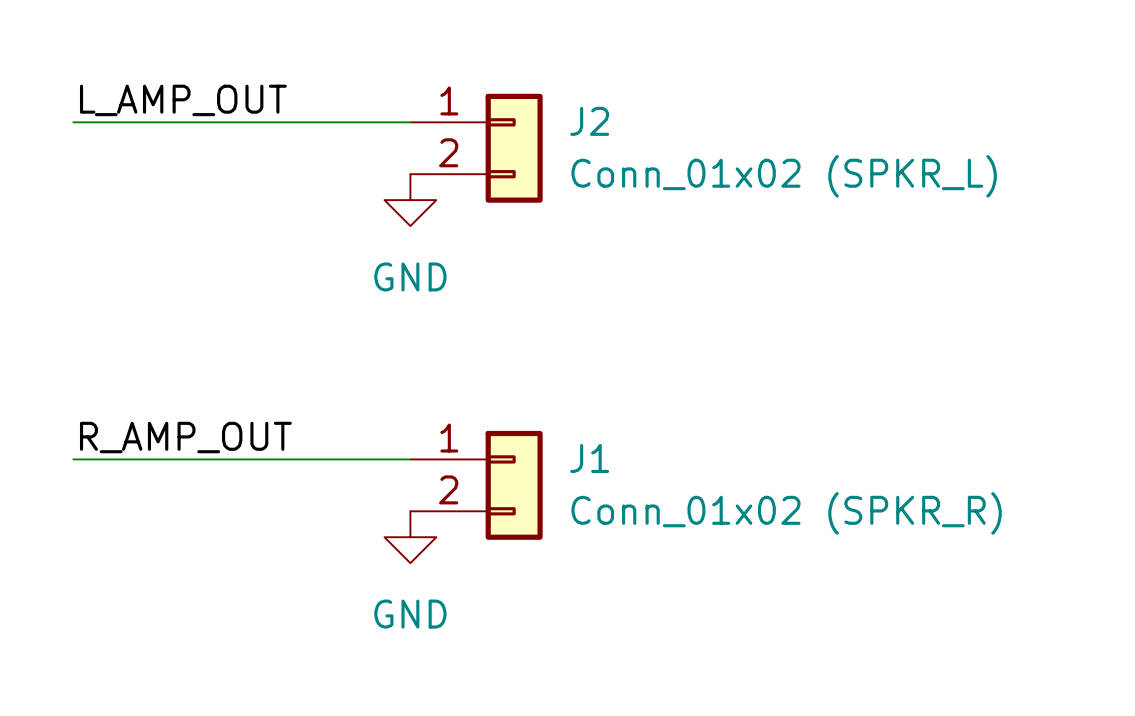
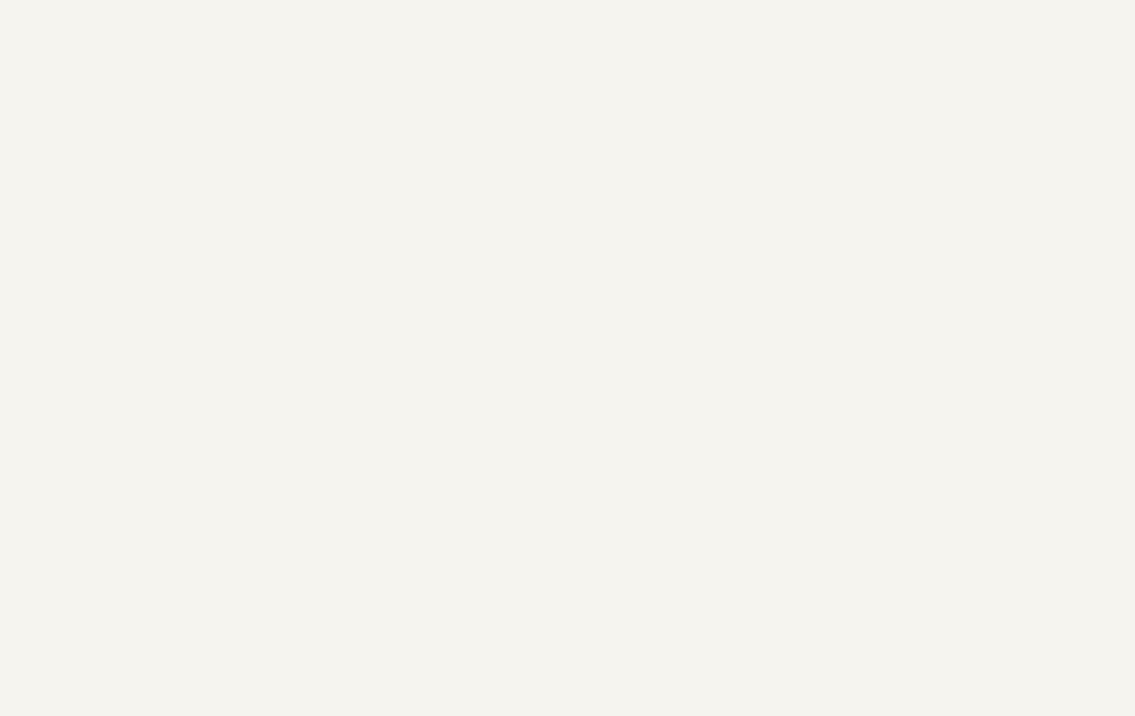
label: L_AMP_OUT (183, 100) -> none
wire: (73, 122) (410, 122) -> none
J2: Conn_01x02 (SPKR_L) (476, 148) -> none
power symbol: GND (410, 200) -> none
label: R_AMP_OUT (185, 437) -> none
wire: (73, 459) (410, 459) -> none
J1: Conn_01x02 (SPKR_R) (476, 485) -> none
power symbol: GND (410, 537) -> none

